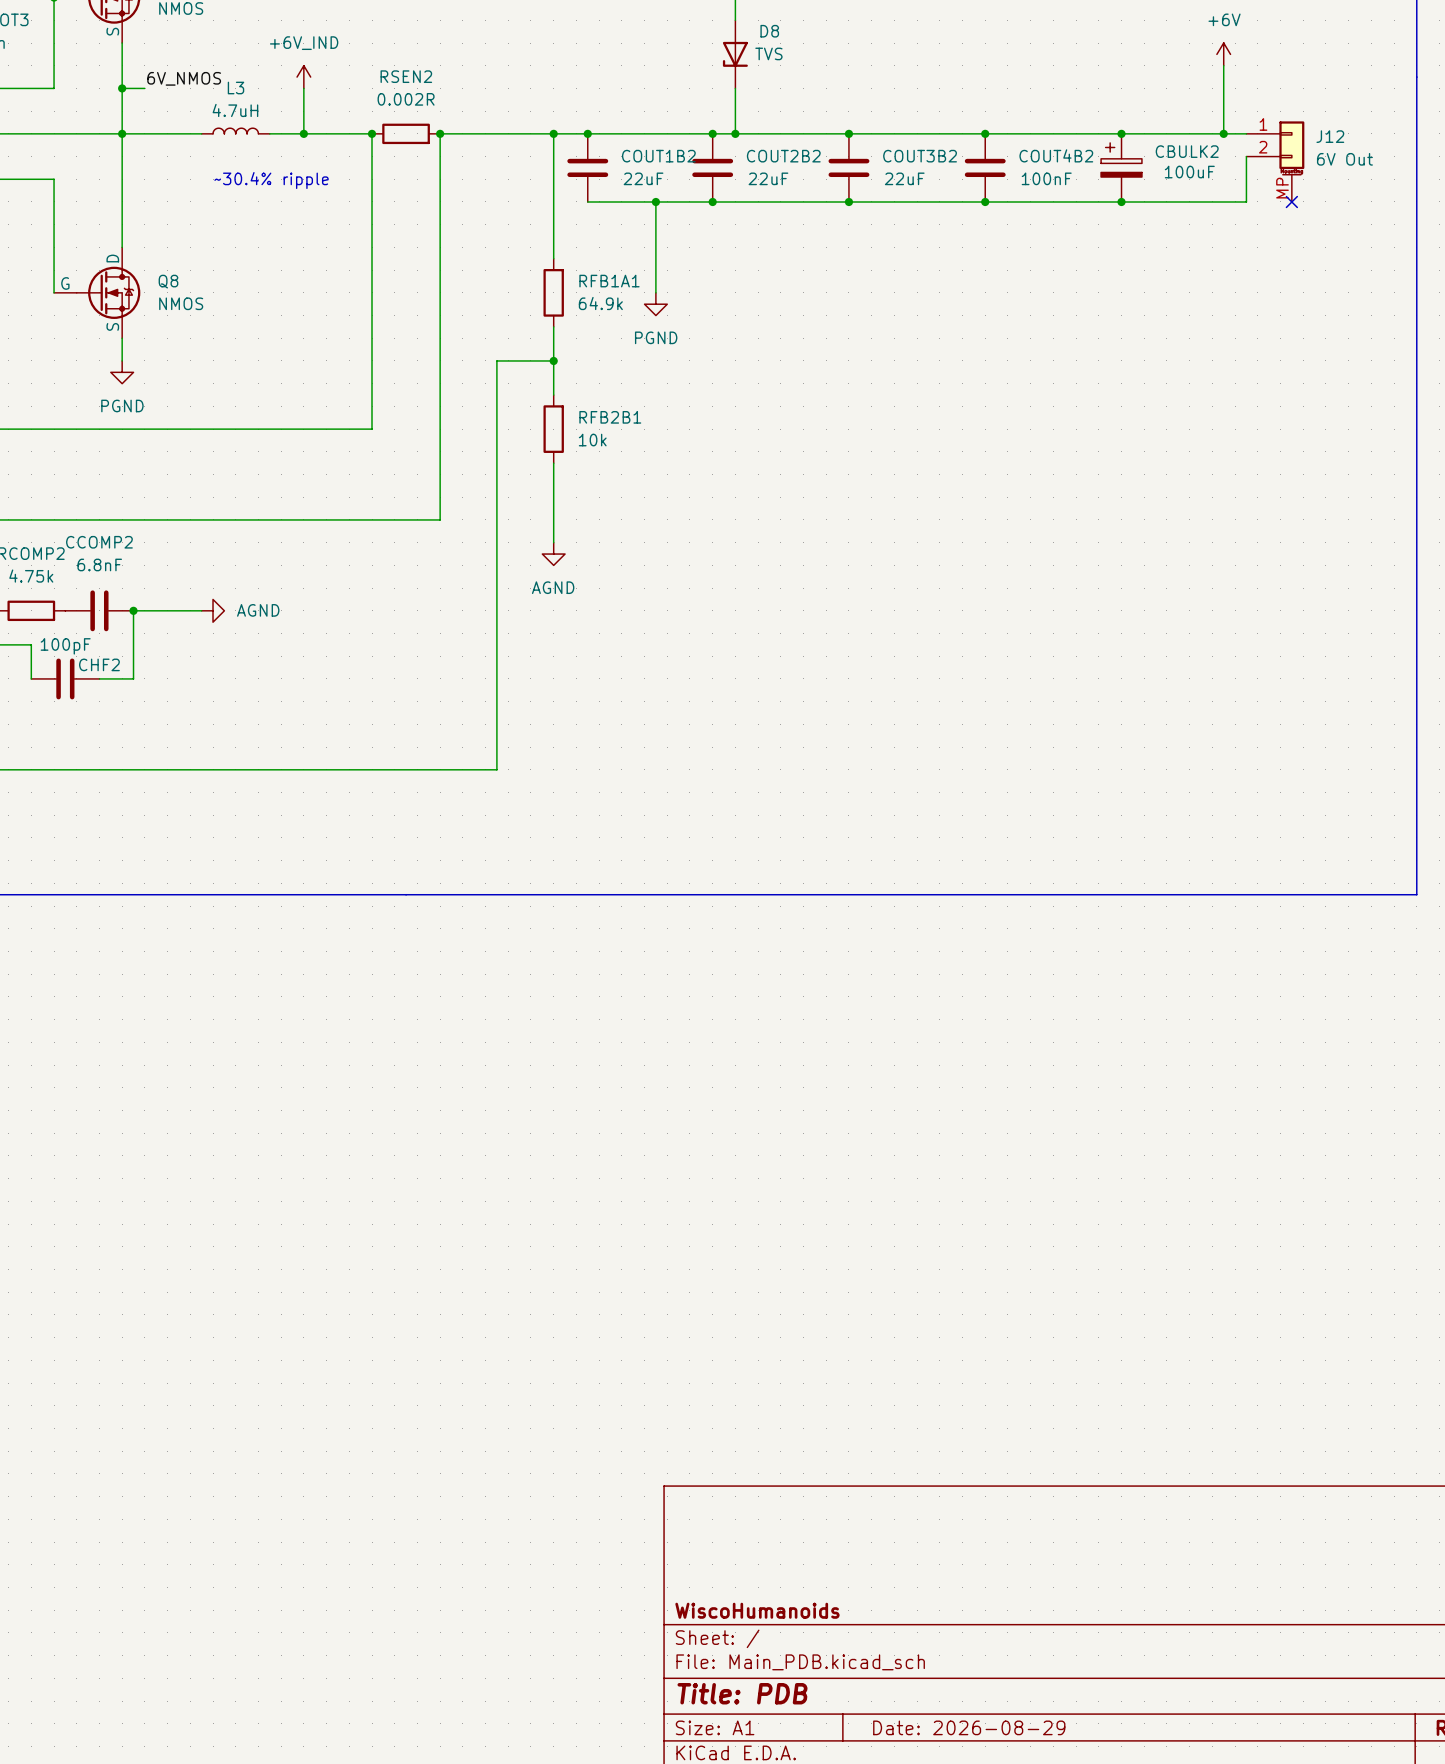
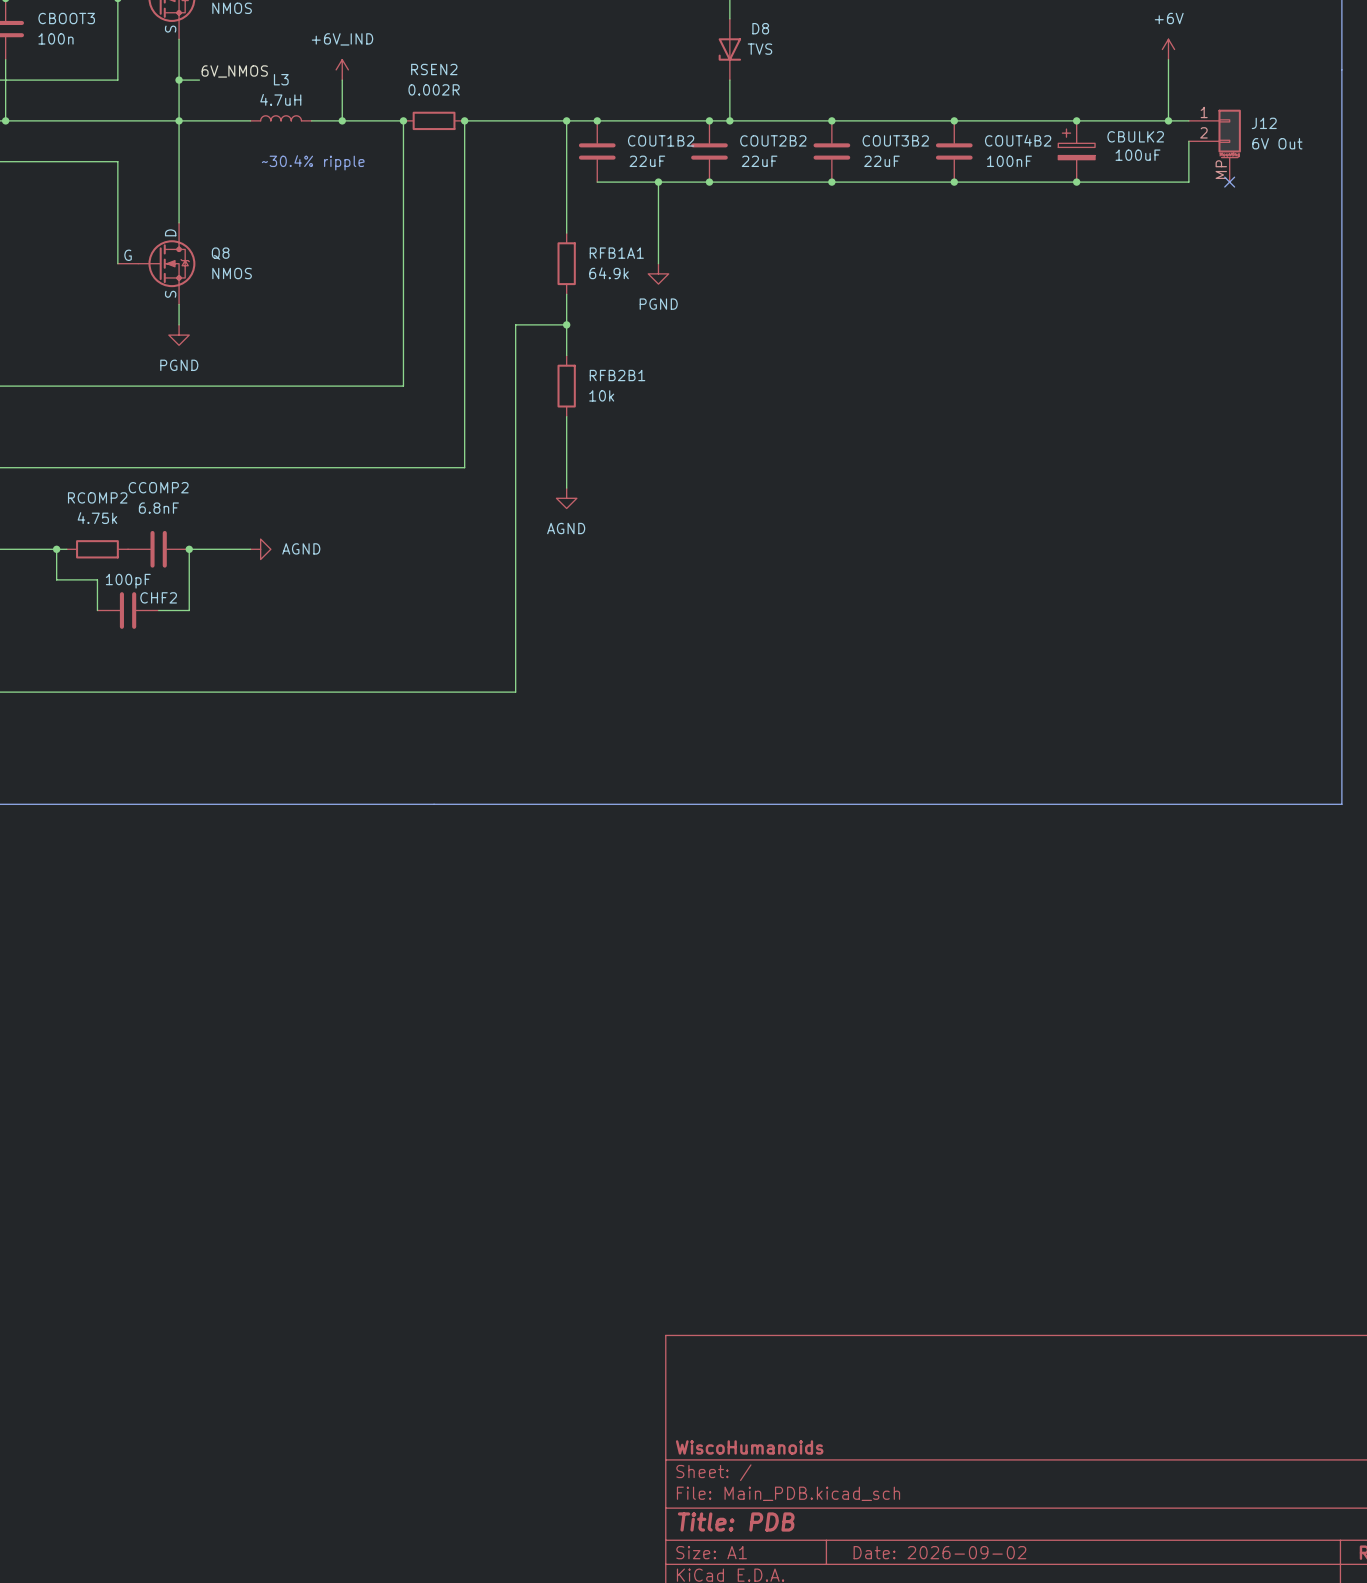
title block: Date: 2026-08-29 (969, 1727) -> Date: 2026-09-02 (939, 1552)

